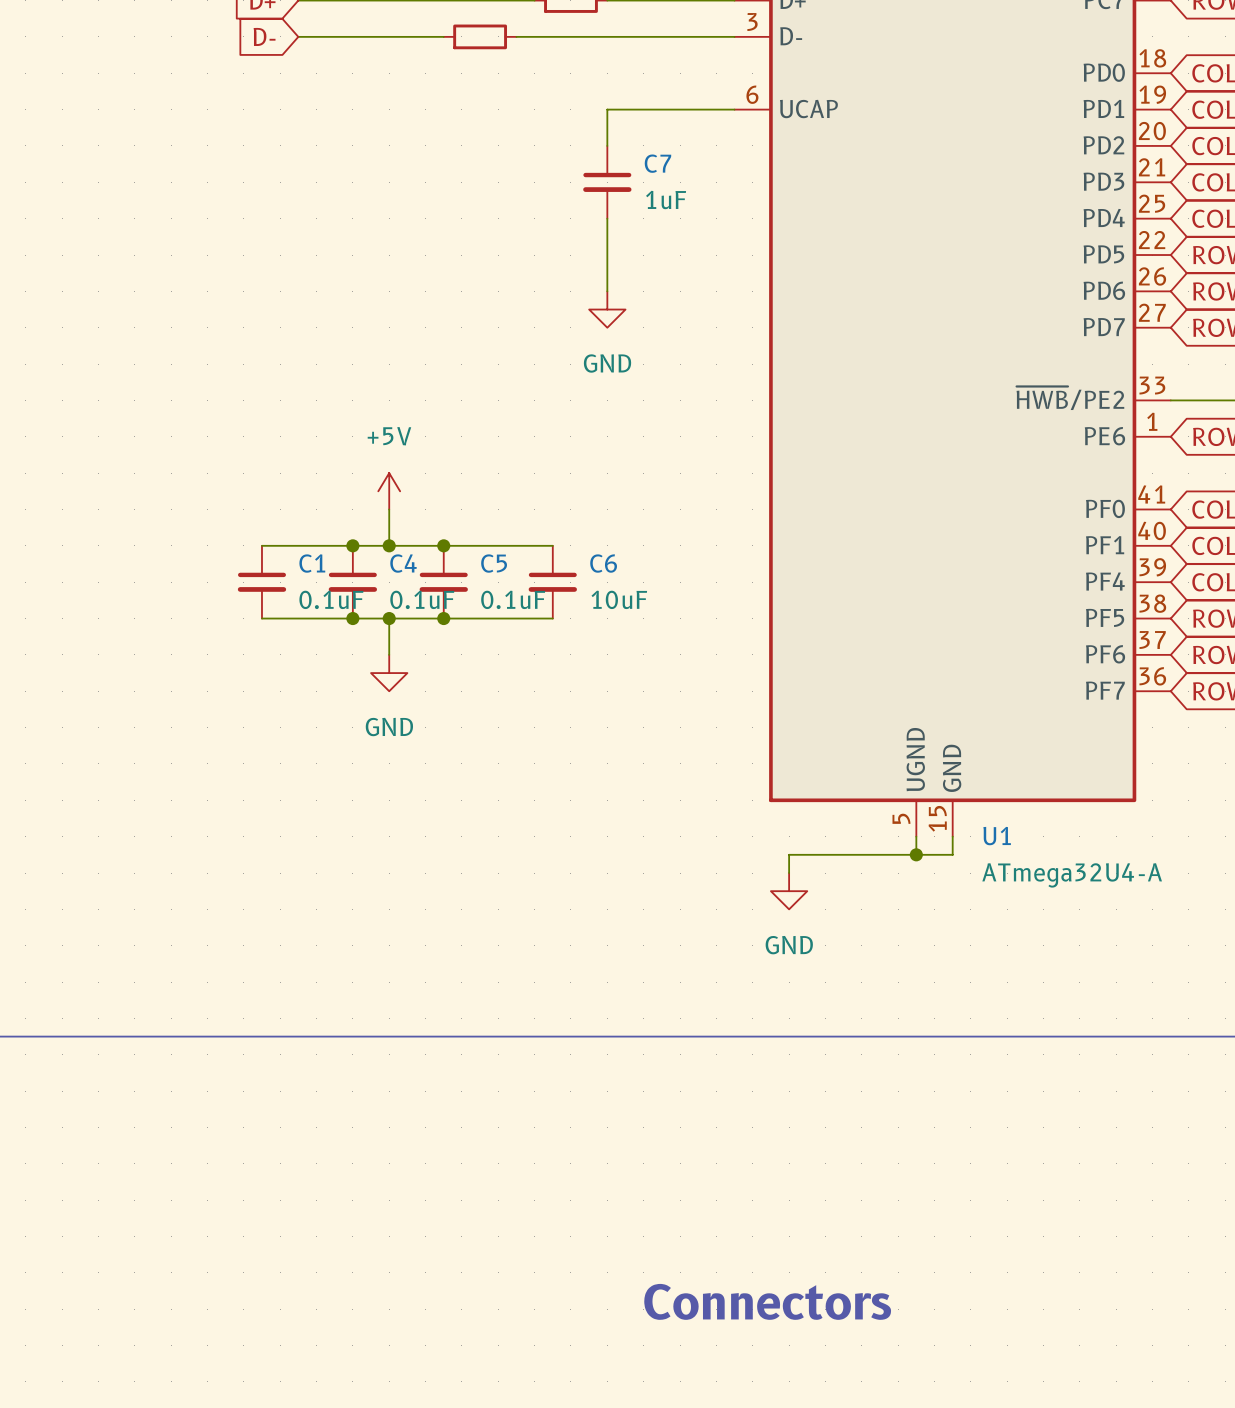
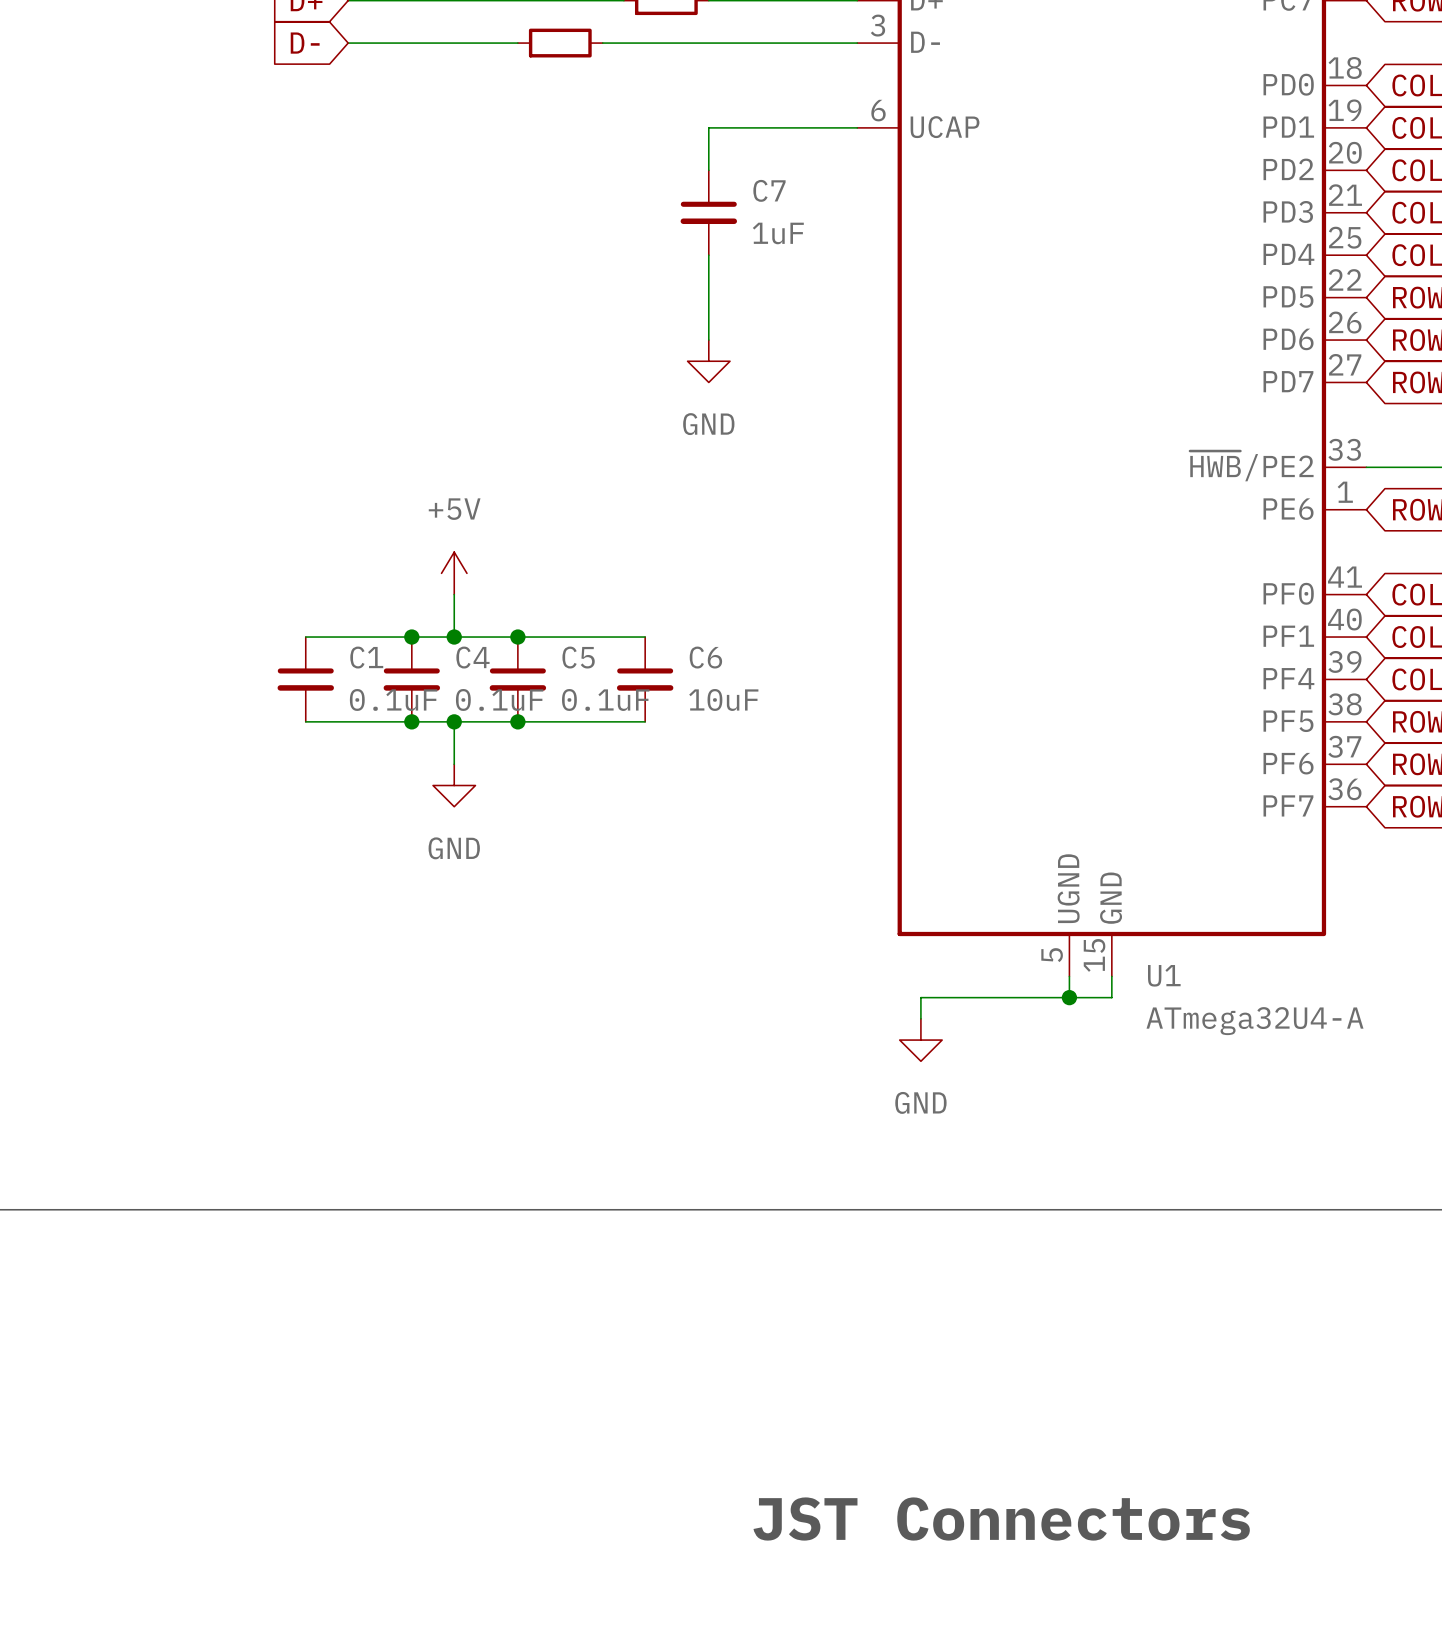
text: Connectors (767, 1301) -> JST Connectors (1001, 1519)

